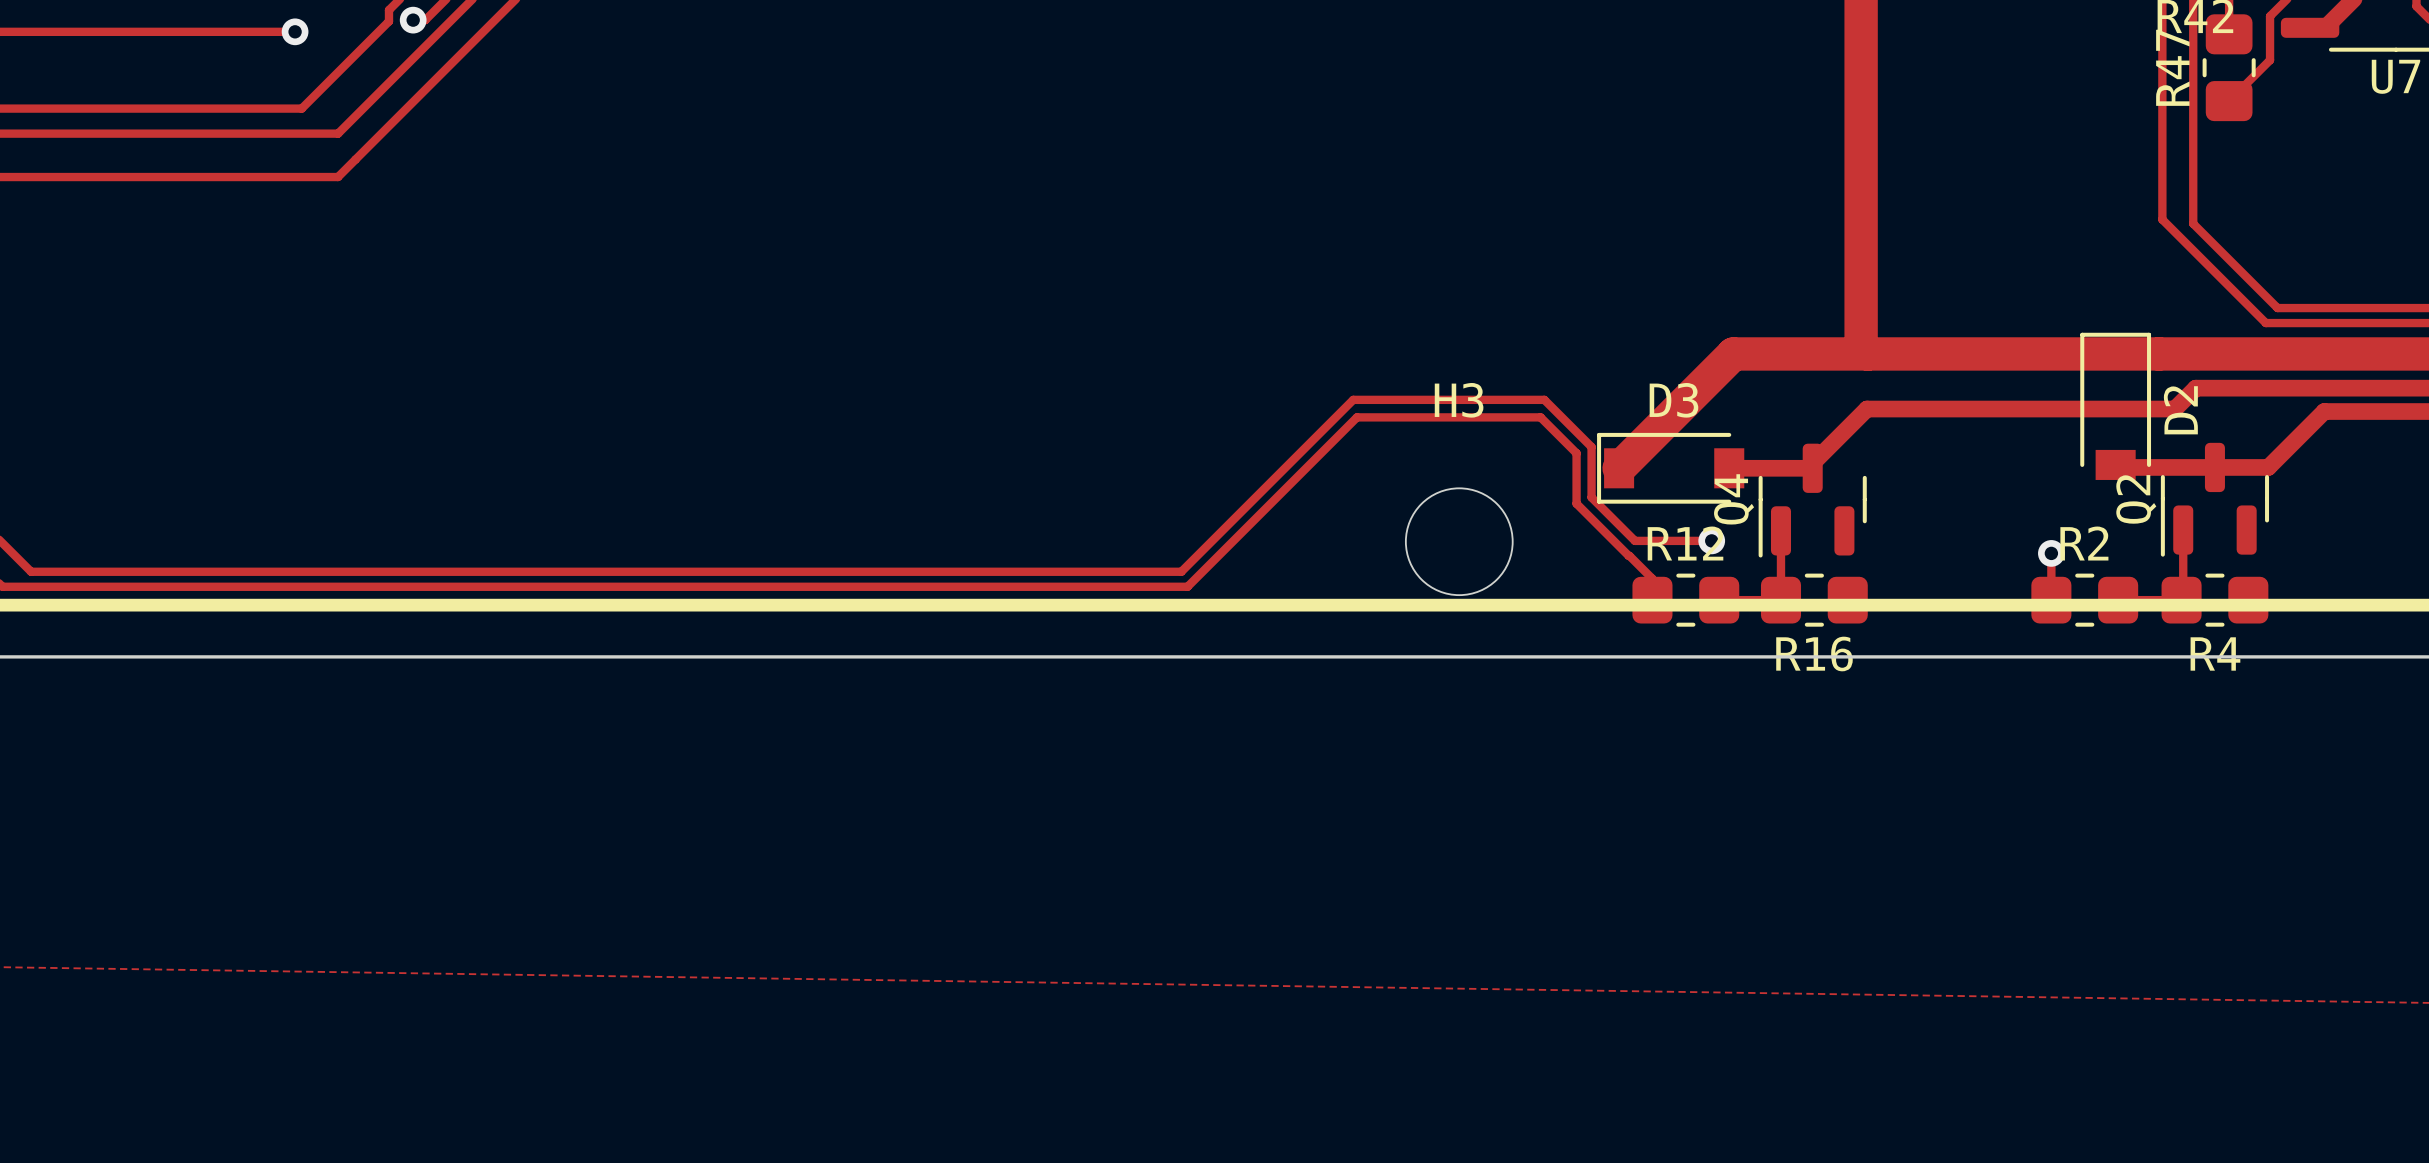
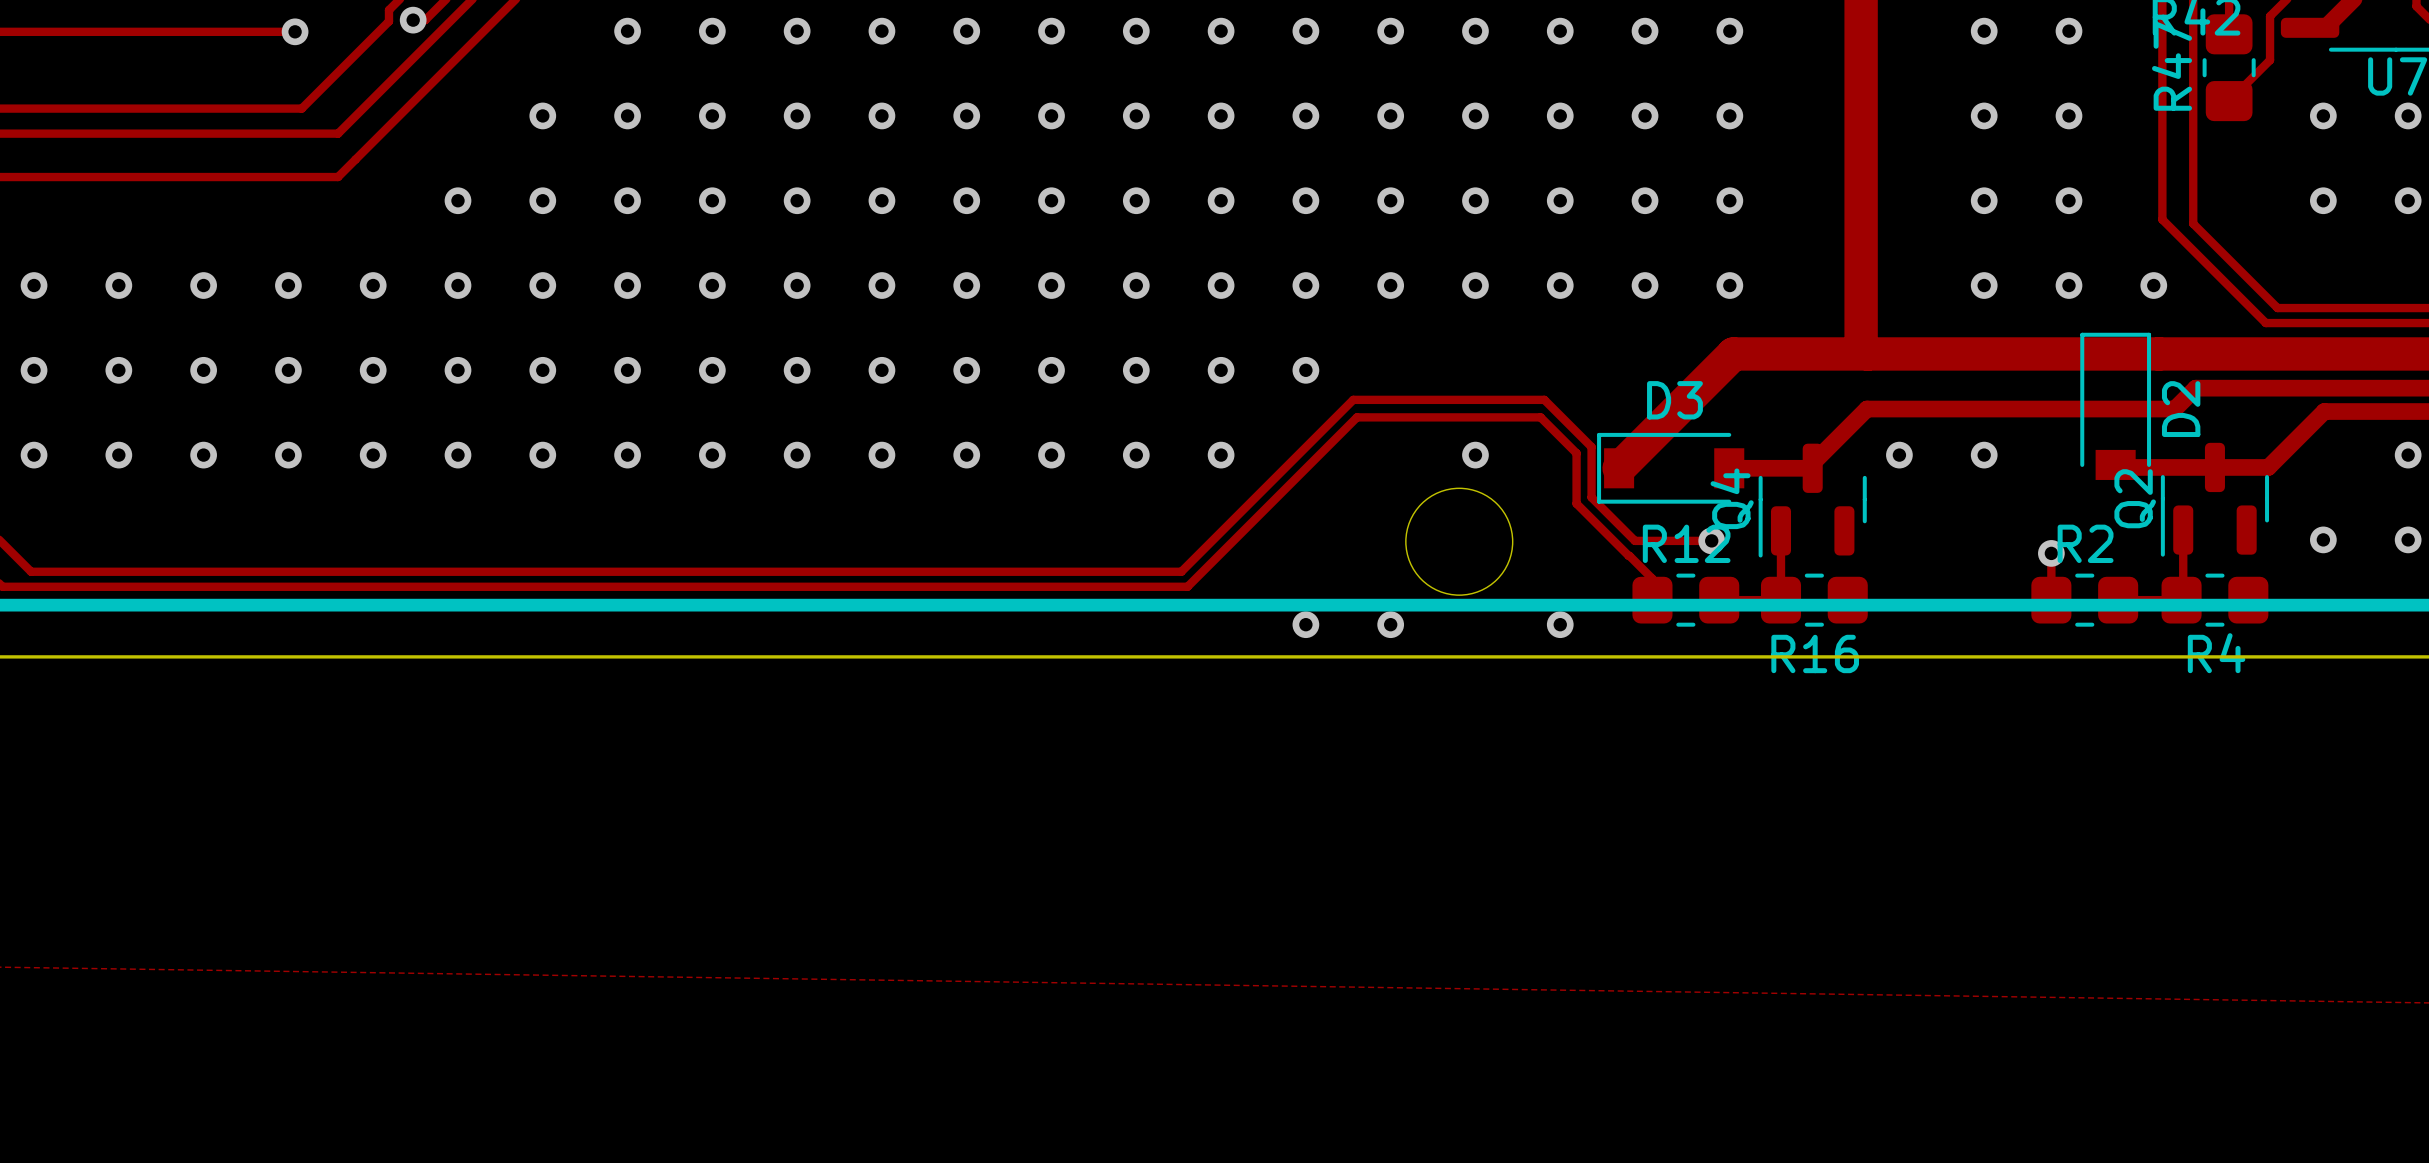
via: none -> (627, 31)
via: none -> (712, 31)
via: none -> (797, 31)
via: none -> (881, 31)
via: none -> (966, 31)
via: none -> (1051, 31)
via: none -> (1136, 31)
via: none -> (1221, 31)
via: none -> (1305, 31)
via: none -> (1390, 31)
via: none -> (1475, 31)
via: none -> (1560, 31)
via: none -> (1645, 31)
via: none -> (1729, 31)
via: none -> (1984, 31)
via: none -> (2068, 31)
via: none -> (542, 115)
via: none -> (627, 115)
via: none -> (712, 115)
via: none -> (797, 115)
via: none -> (881, 115)
via: none -> (966, 115)
via: none -> (1051, 115)
via: none -> (1136, 115)
via: none -> (1221, 115)
via: none -> (1305, 115)
via: none -> (1390, 115)
via: none -> (1475, 115)
via: none -> (1560, 115)
via: none -> (1645, 115)
via: none -> (1729, 115)
via: none -> (1984, 115)
via: none -> (2068, 115)
via: none -> (2323, 115)
via: none -> (2408, 115)
via: none -> (457, 200)
via: none -> (542, 200)
via: none -> (627, 200)
via: none -> (712, 200)
via: none -> (797, 200)
via: none -> (881, 200)
via: none -> (966, 200)
via: none -> (1051, 200)
via: none -> (1136, 200)
via: none -> (1221, 200)
via: none -> (1305, 200)
via: none -> (1390, 200)
via: none -> (1475, 200)
via: none -> (1560, 200)
via: none -> (1645, 200)
via: none -> (1729, 200)
via: none -> (1984, 200)
via: none -> (2068, 200)
via: none -> (2323, 200)
via: none -> (2408, 200)
via: none -> (34, 285)
via: none -> (118, 285)
via: none -> (203, 285)
via: none -> (288, 285)
via: none -> (373, 285)
via: none -> (457, 285)
via: none -> (542, 285)
via: none -> (627, 285)
via: none -> (712, 285)
via: none -> (797, 285)
via: none -> (881, 285)
via: none -> (966, 285)
via: none -> (1051, 285)
via: none -> (1136, 285)
via: none -> (1221, 285)
via: none -> (1305, 285)
via: none -> (1390, 285)
via: none -> (1475, 285)
via: none -> (1560, 285)
via: none -> (1645, 285)
via: none -> (1729, 285)
via: none -> (1984, 285)
via: none -> (2068, 285)
via: none -> (2153, 285)
via: none -> (34, 370)
via: none -> (118, 370)
via: none -> (203, 370)
via: none -> (288, 370)
via: none -> (373, 370)
via: none -> (457, 370)
via: none -> (542, 370)
via: none -> (627, 370)
via: none -> (712, 370)
via: none -> (797, 370)
via: none -> (881, 370)
via: none -> (966, 370)
via: none -> (1051, 370)
via: none -> (1136, 370)
via: none -> (1221, 370)
via: none -> (1305, 370)
H3 name: H3 (1459, 400) -> none
via: none -> (34, 455)
via: none -> (118, 455)
via: none -> (203, 455)
via: none -> (288, 455)
via: none -> (373, 455)
via: none -> (457, 455)
via: none -> (542, 455)
via: none -> (627, 455)
via: none -> (712, 455)
via: none -> (797, 455)
via: none -> (881, 455)
via: none -> (966, 455)
via: none -> (1051, 455)
via: none -> (1136, 455)
via: none -> (1221, 455)
via: none -> (1475, 455)
via: none -> (1899, 455)
via: none -> (1984, 455)
via: none -> (2408, 455)
via: none -> (2323, 539)
via: none -> (2408, 539)
via: none -> (1305, 624)
via: none -> (1390, 624)
via: none -> (1560, 624)

